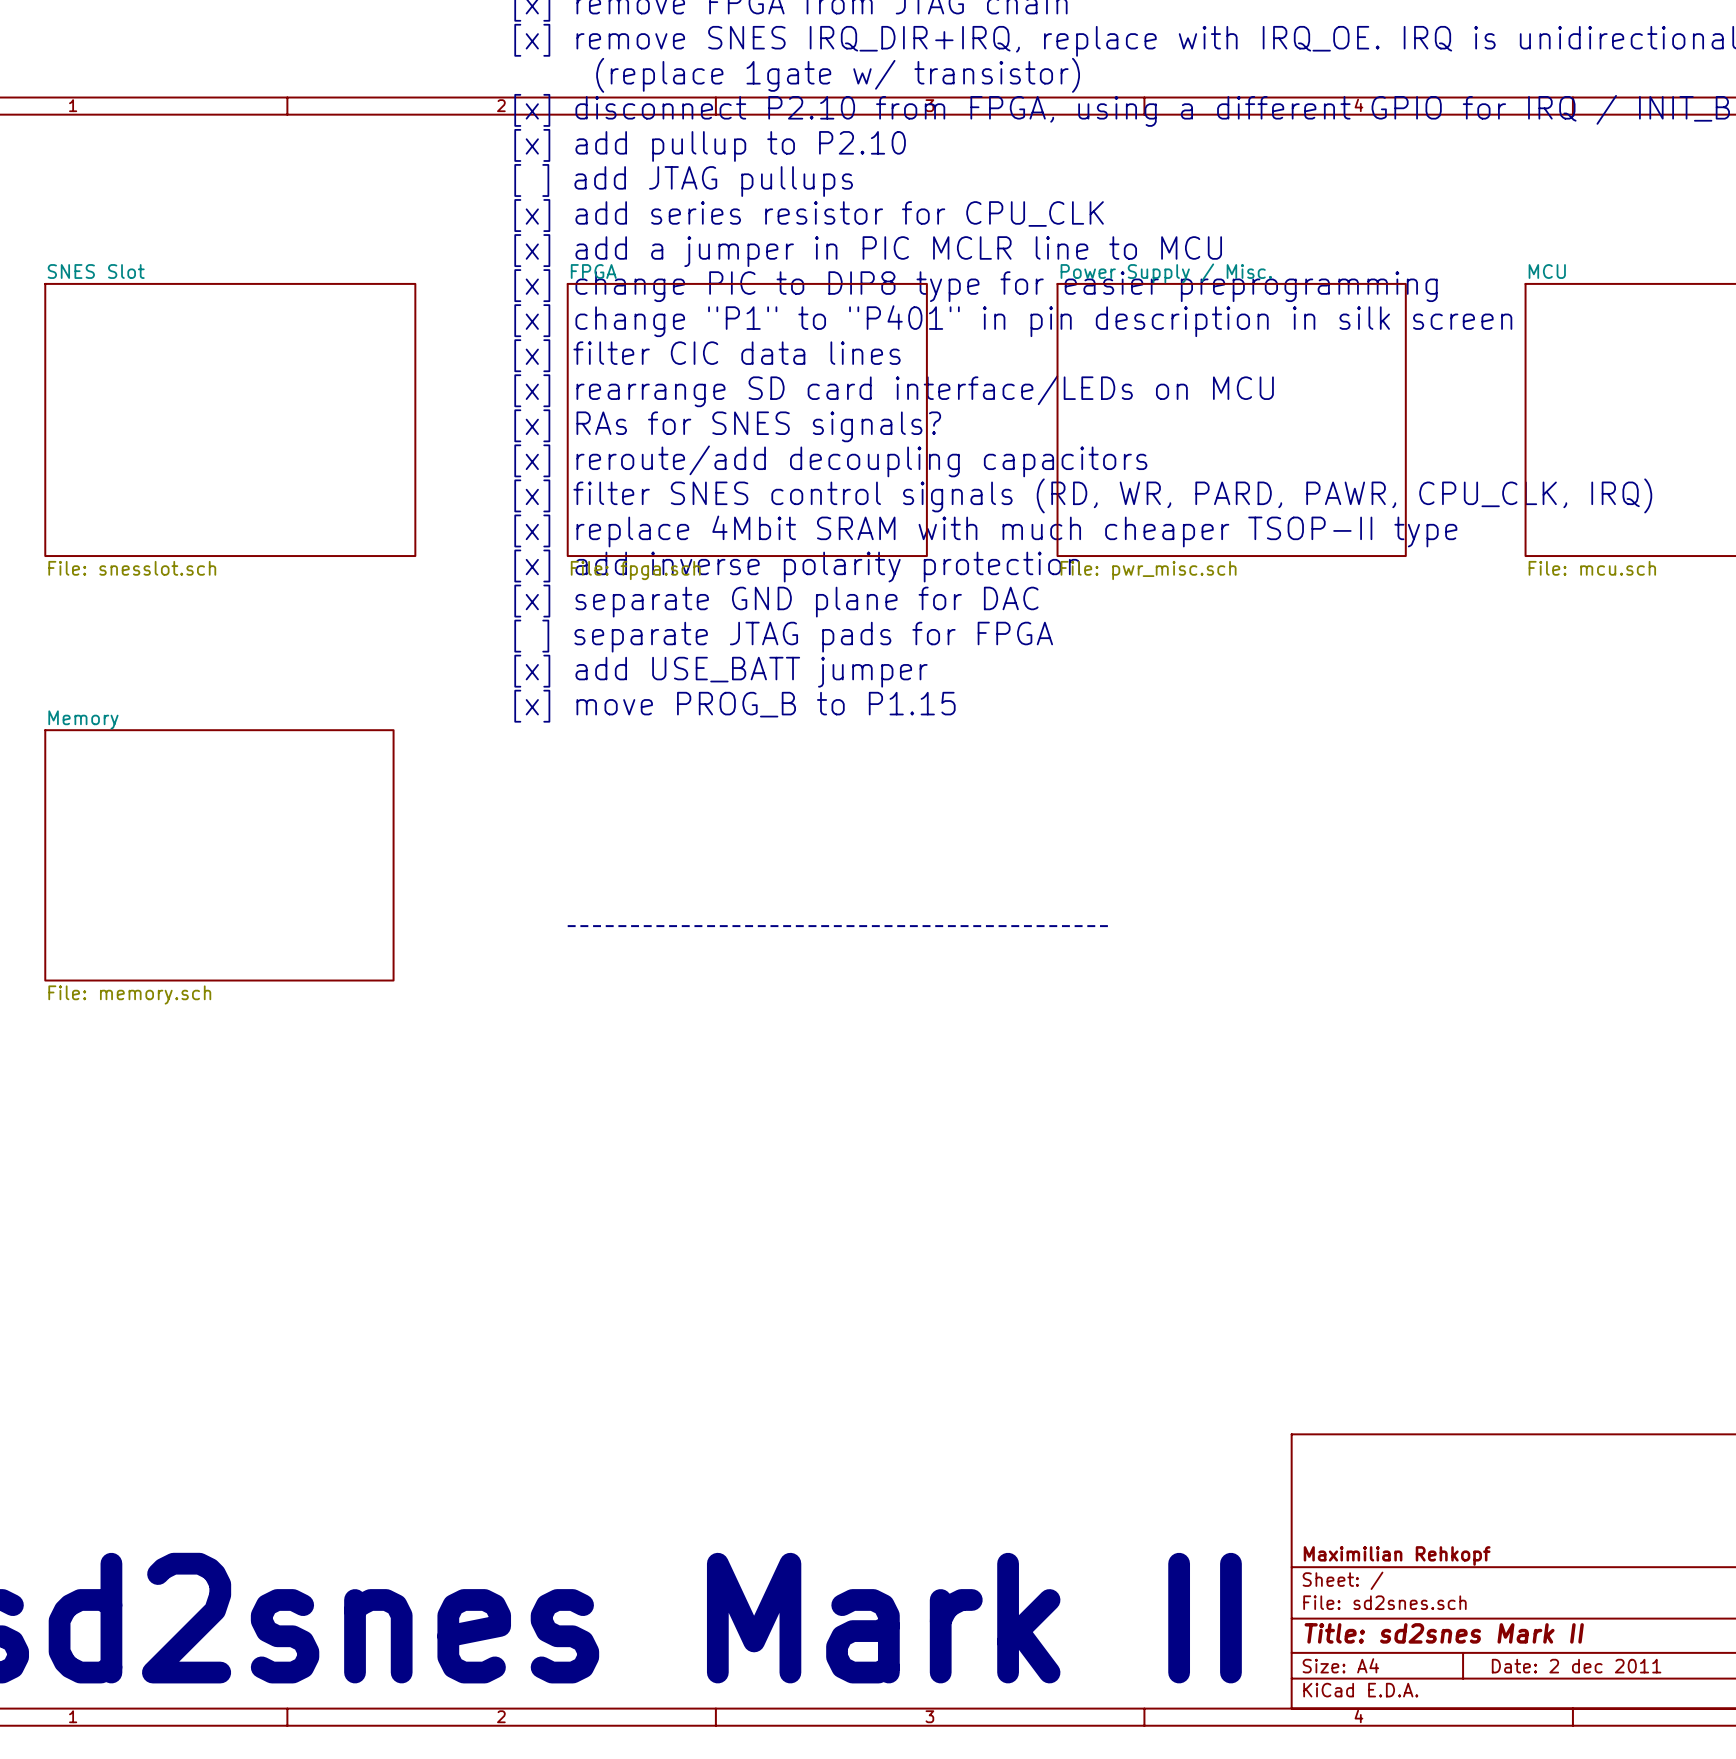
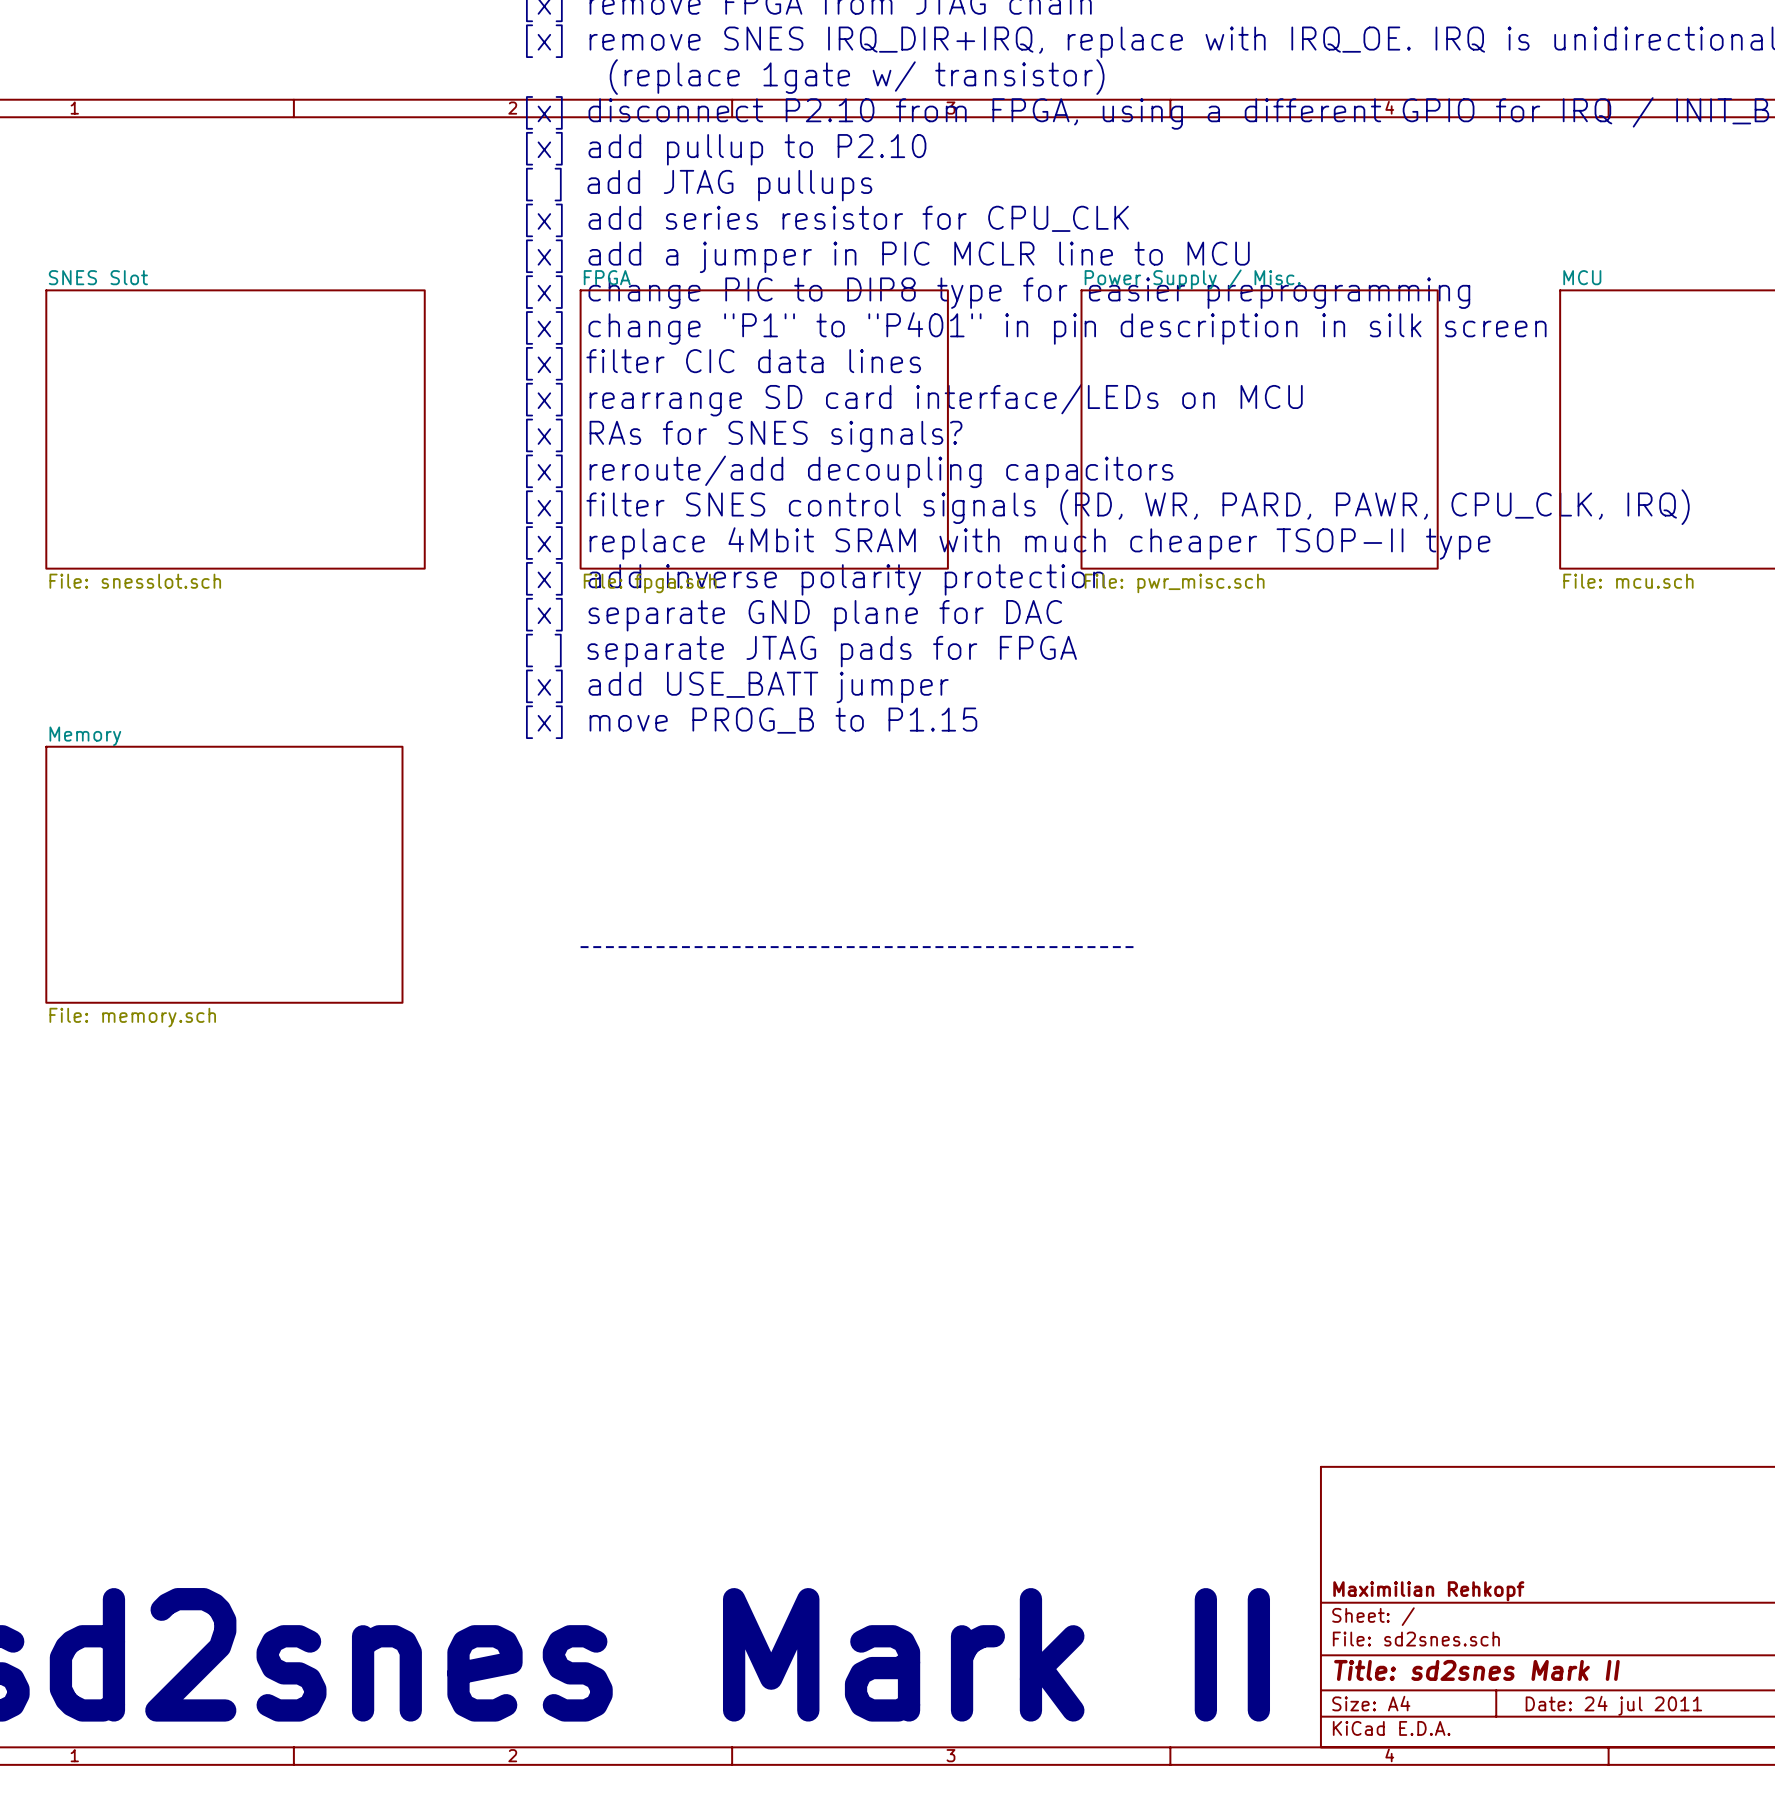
title block: Date: 2 dec 2011 (1576, 1666) -> Date: 24 jul 2011 (1613, 1705)

